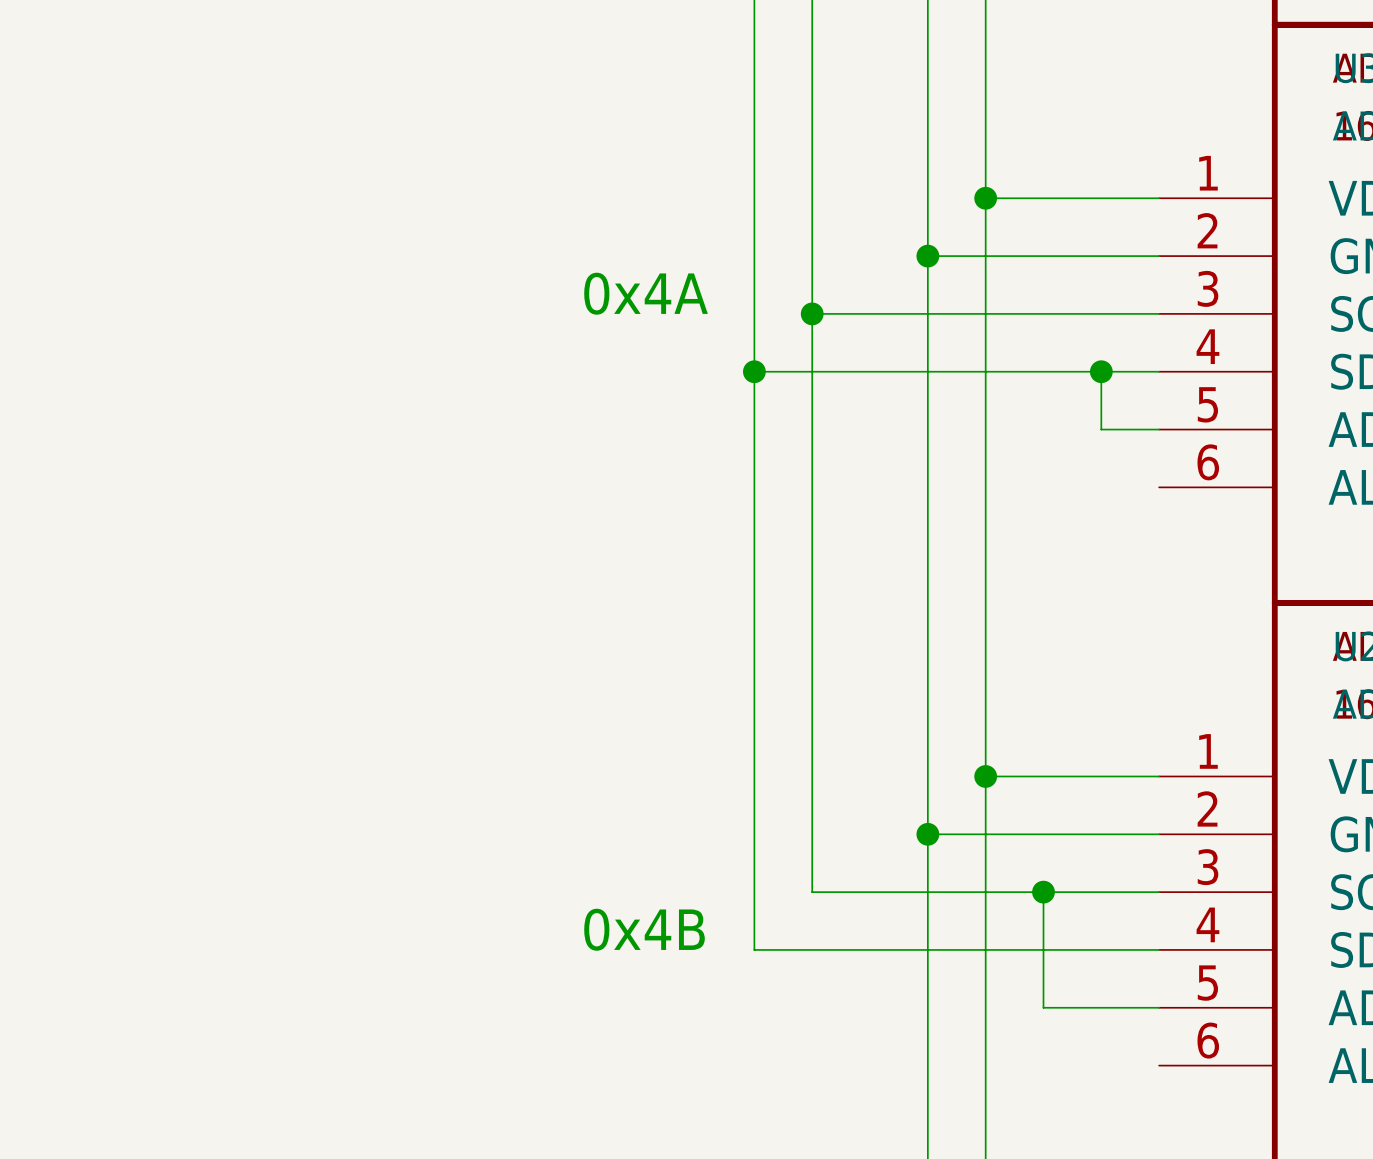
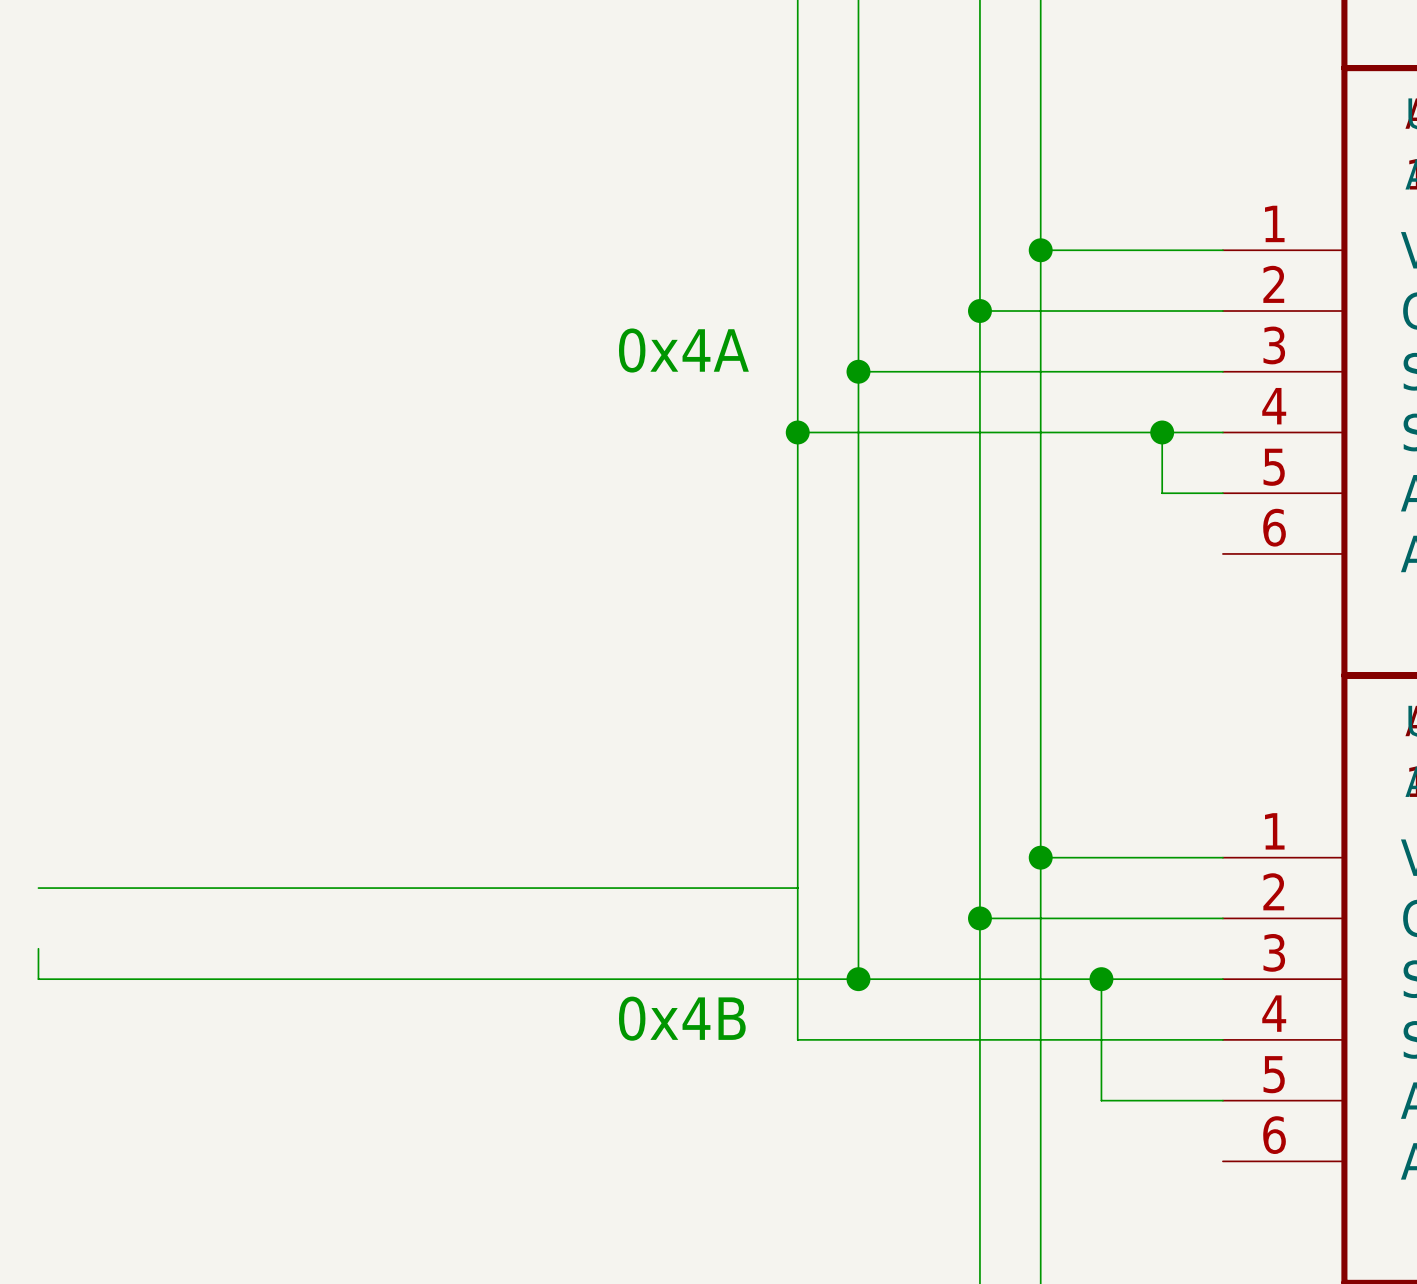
wire: none -> (38, 888) (797, 888)
wire: none -> (38, 948) (38, 979) (858, 979)
junction: none -> (858, 979)

